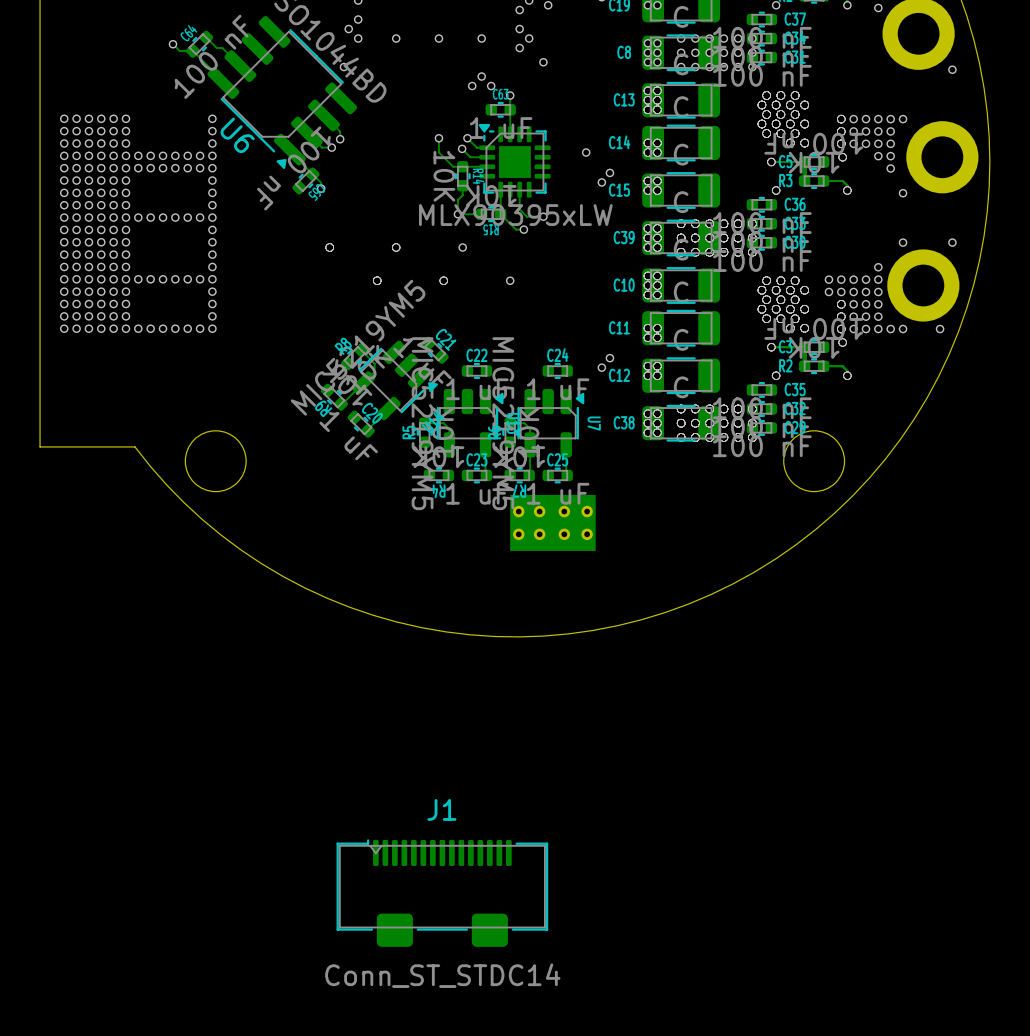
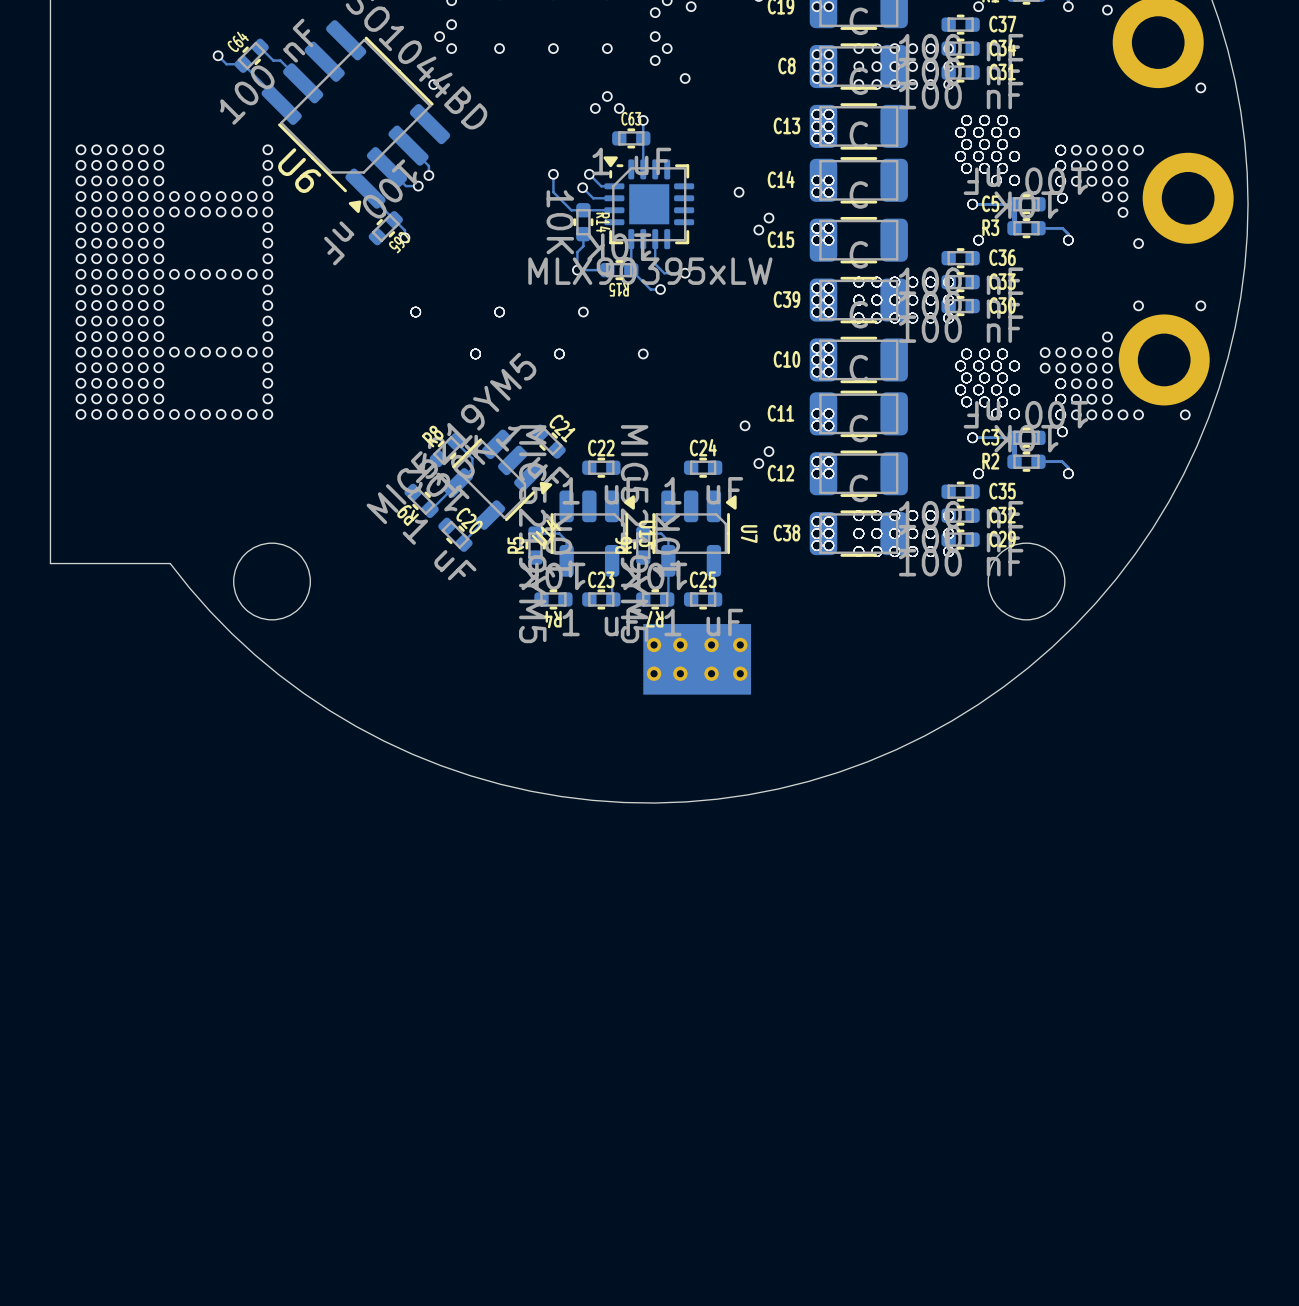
via: none -> (745, 425)
J1: Conn_ST_STDC14 (442, 893) -> none

